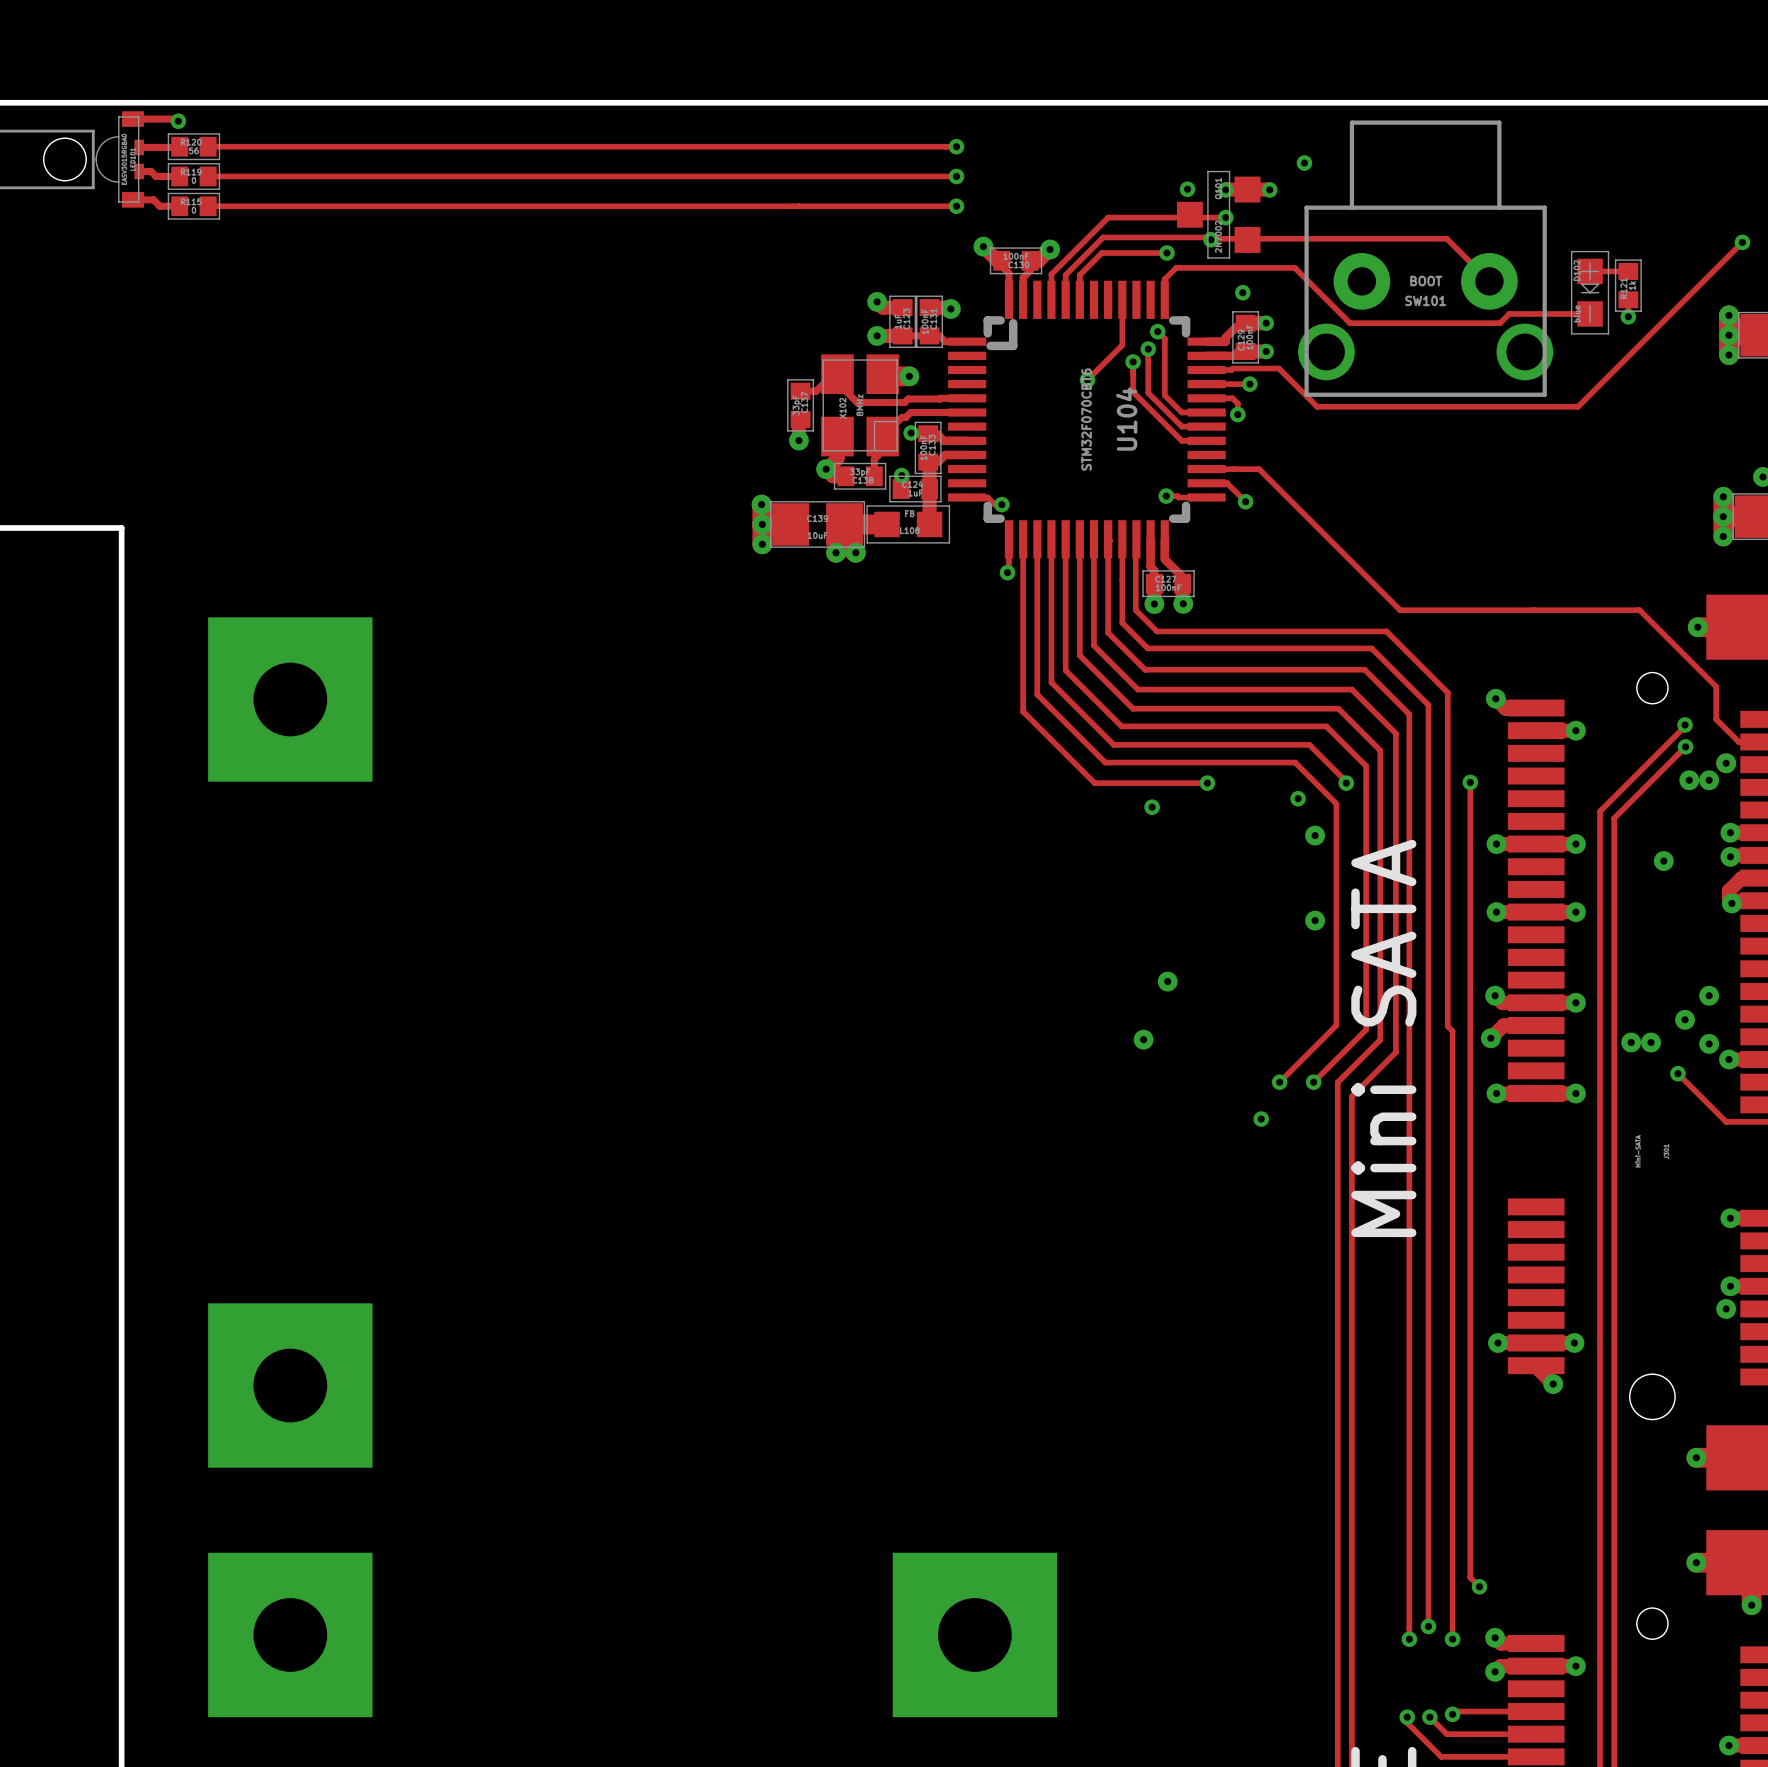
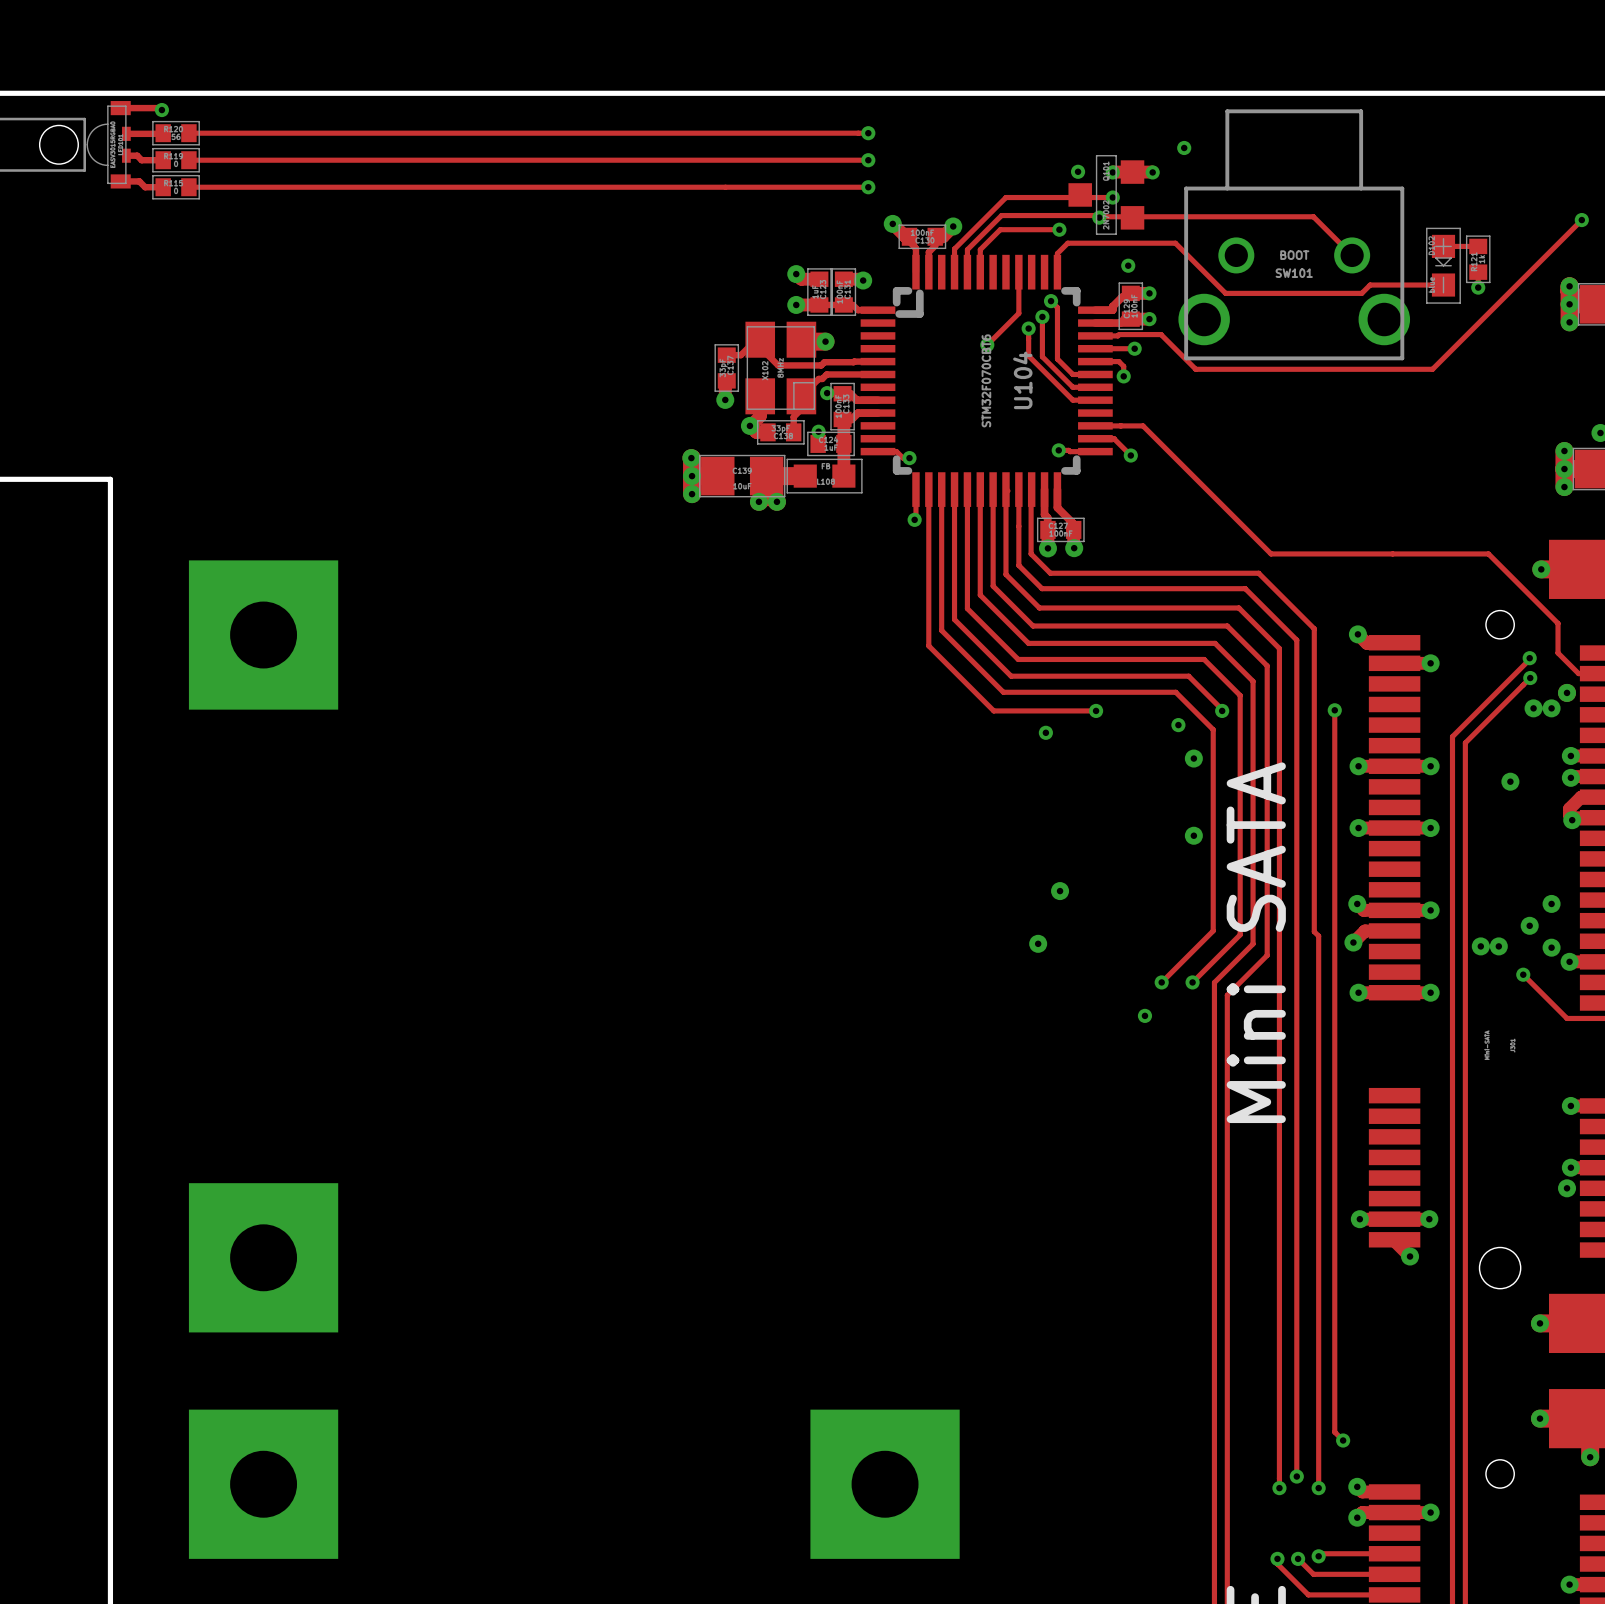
SW101 footprint: [1298, 120, 1554, 397] -> [1178, 109, 1411, 361]

